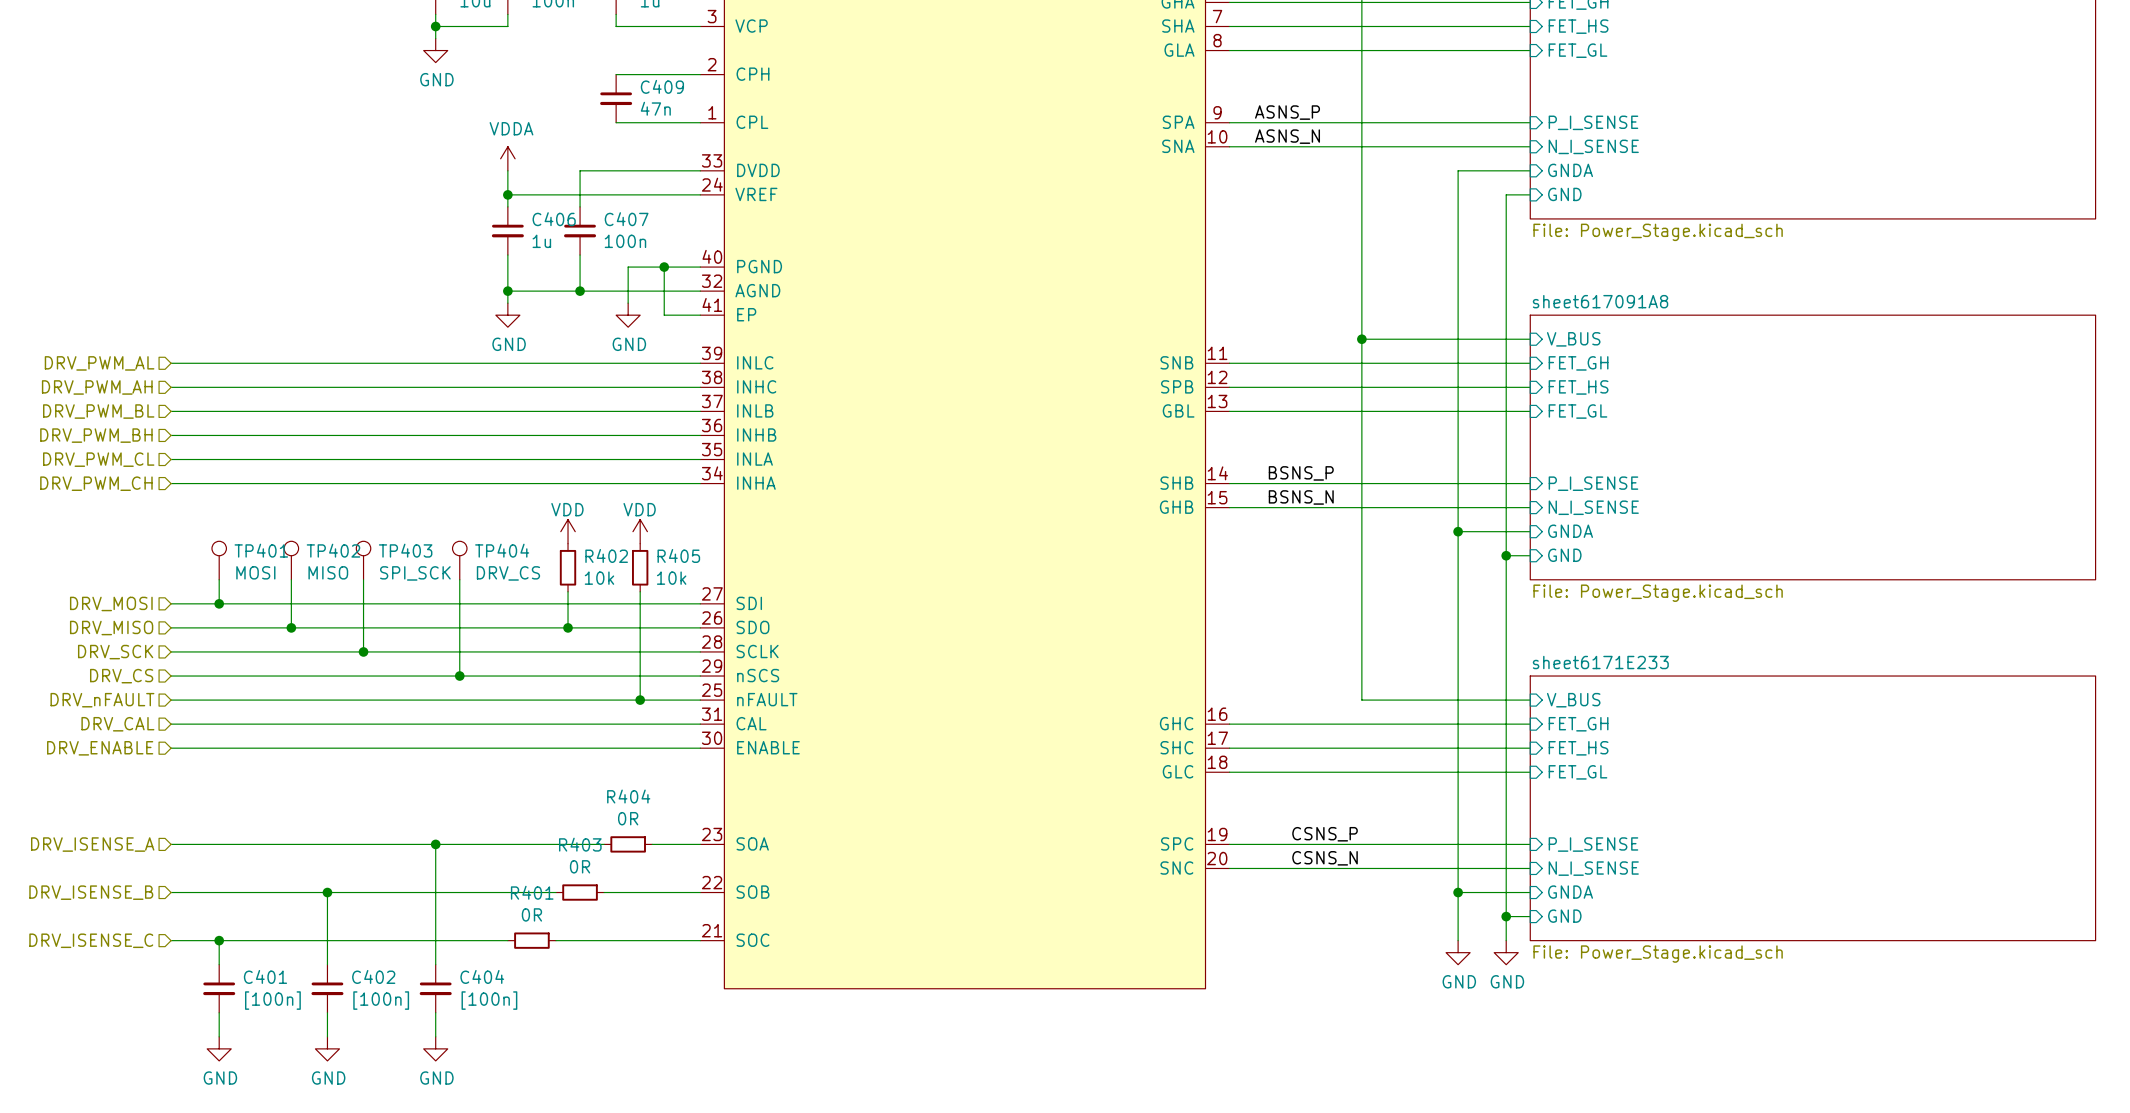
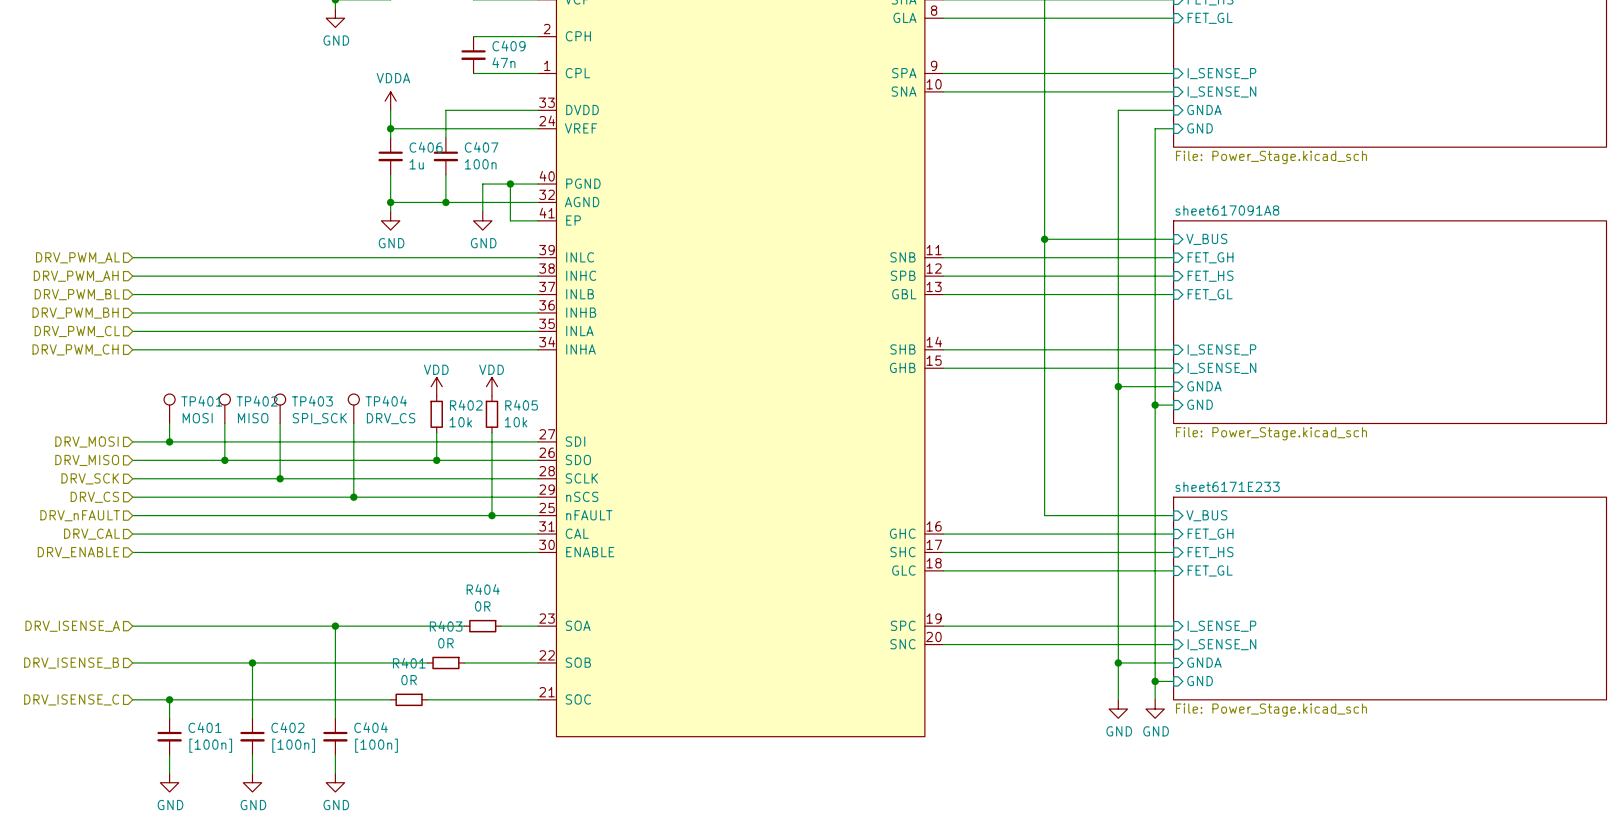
label: ASNS_P (1287, 112) -> none
sheet pin: P_I_SENSE (1593, 122) -> I_SENSE_P (1221, 73)
label: ASNS_N (1287, 136) -> none
sheet pin: N_I_SENSE (1593, 146) -> I_SENSE_N (1221, 92)
label: BSNS_P (1301, 473) -> none
sheet pin: P_I_SENSE (1593, 483) -> I_SENSE_P (1221, 349)
label: BSNS_N (1301, 497) -> none
sheet pin: N_I_SENSE (1593, 507) -> I_SENSE_N (1221, 368)
label: CSNS_P (1325, 834) -> none
sheet pin: P_I_SENSE (1593, 844) -> I_SENSE_P (1221, 626)
label: CSNS_N (1325, 858) -> none
sheet pin: N_I_SENSE (1593, 868) -> I_SENSE_N (1221, 644)

